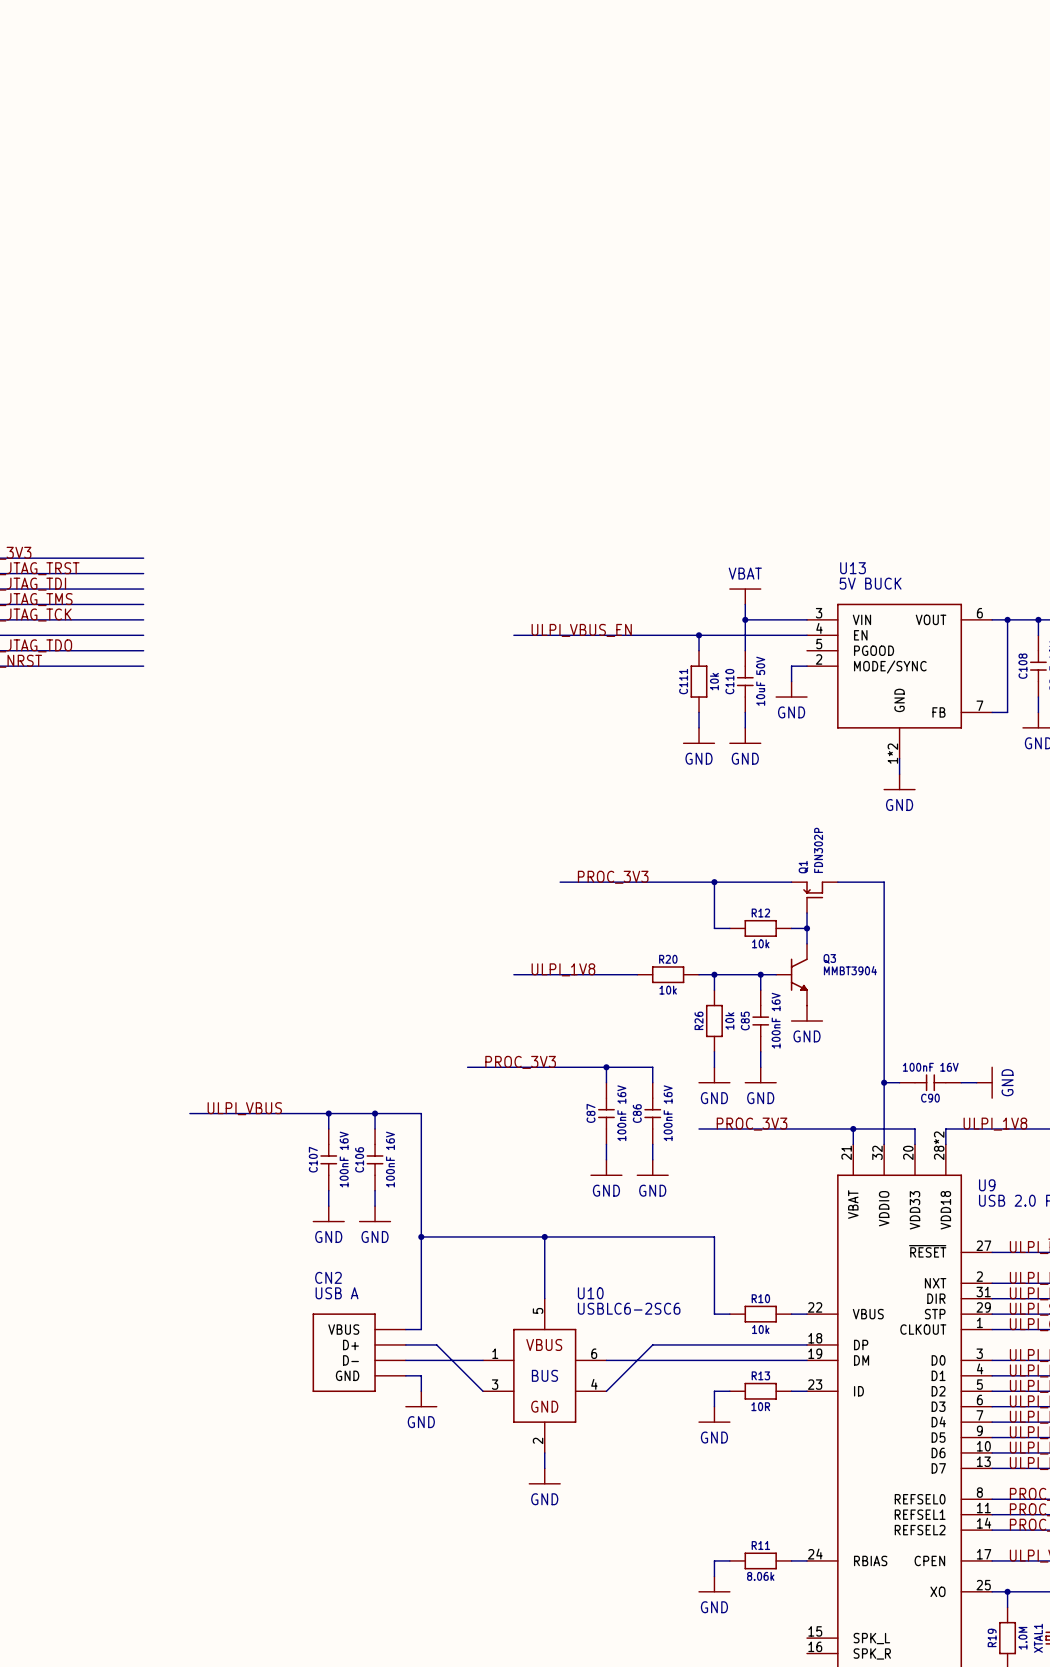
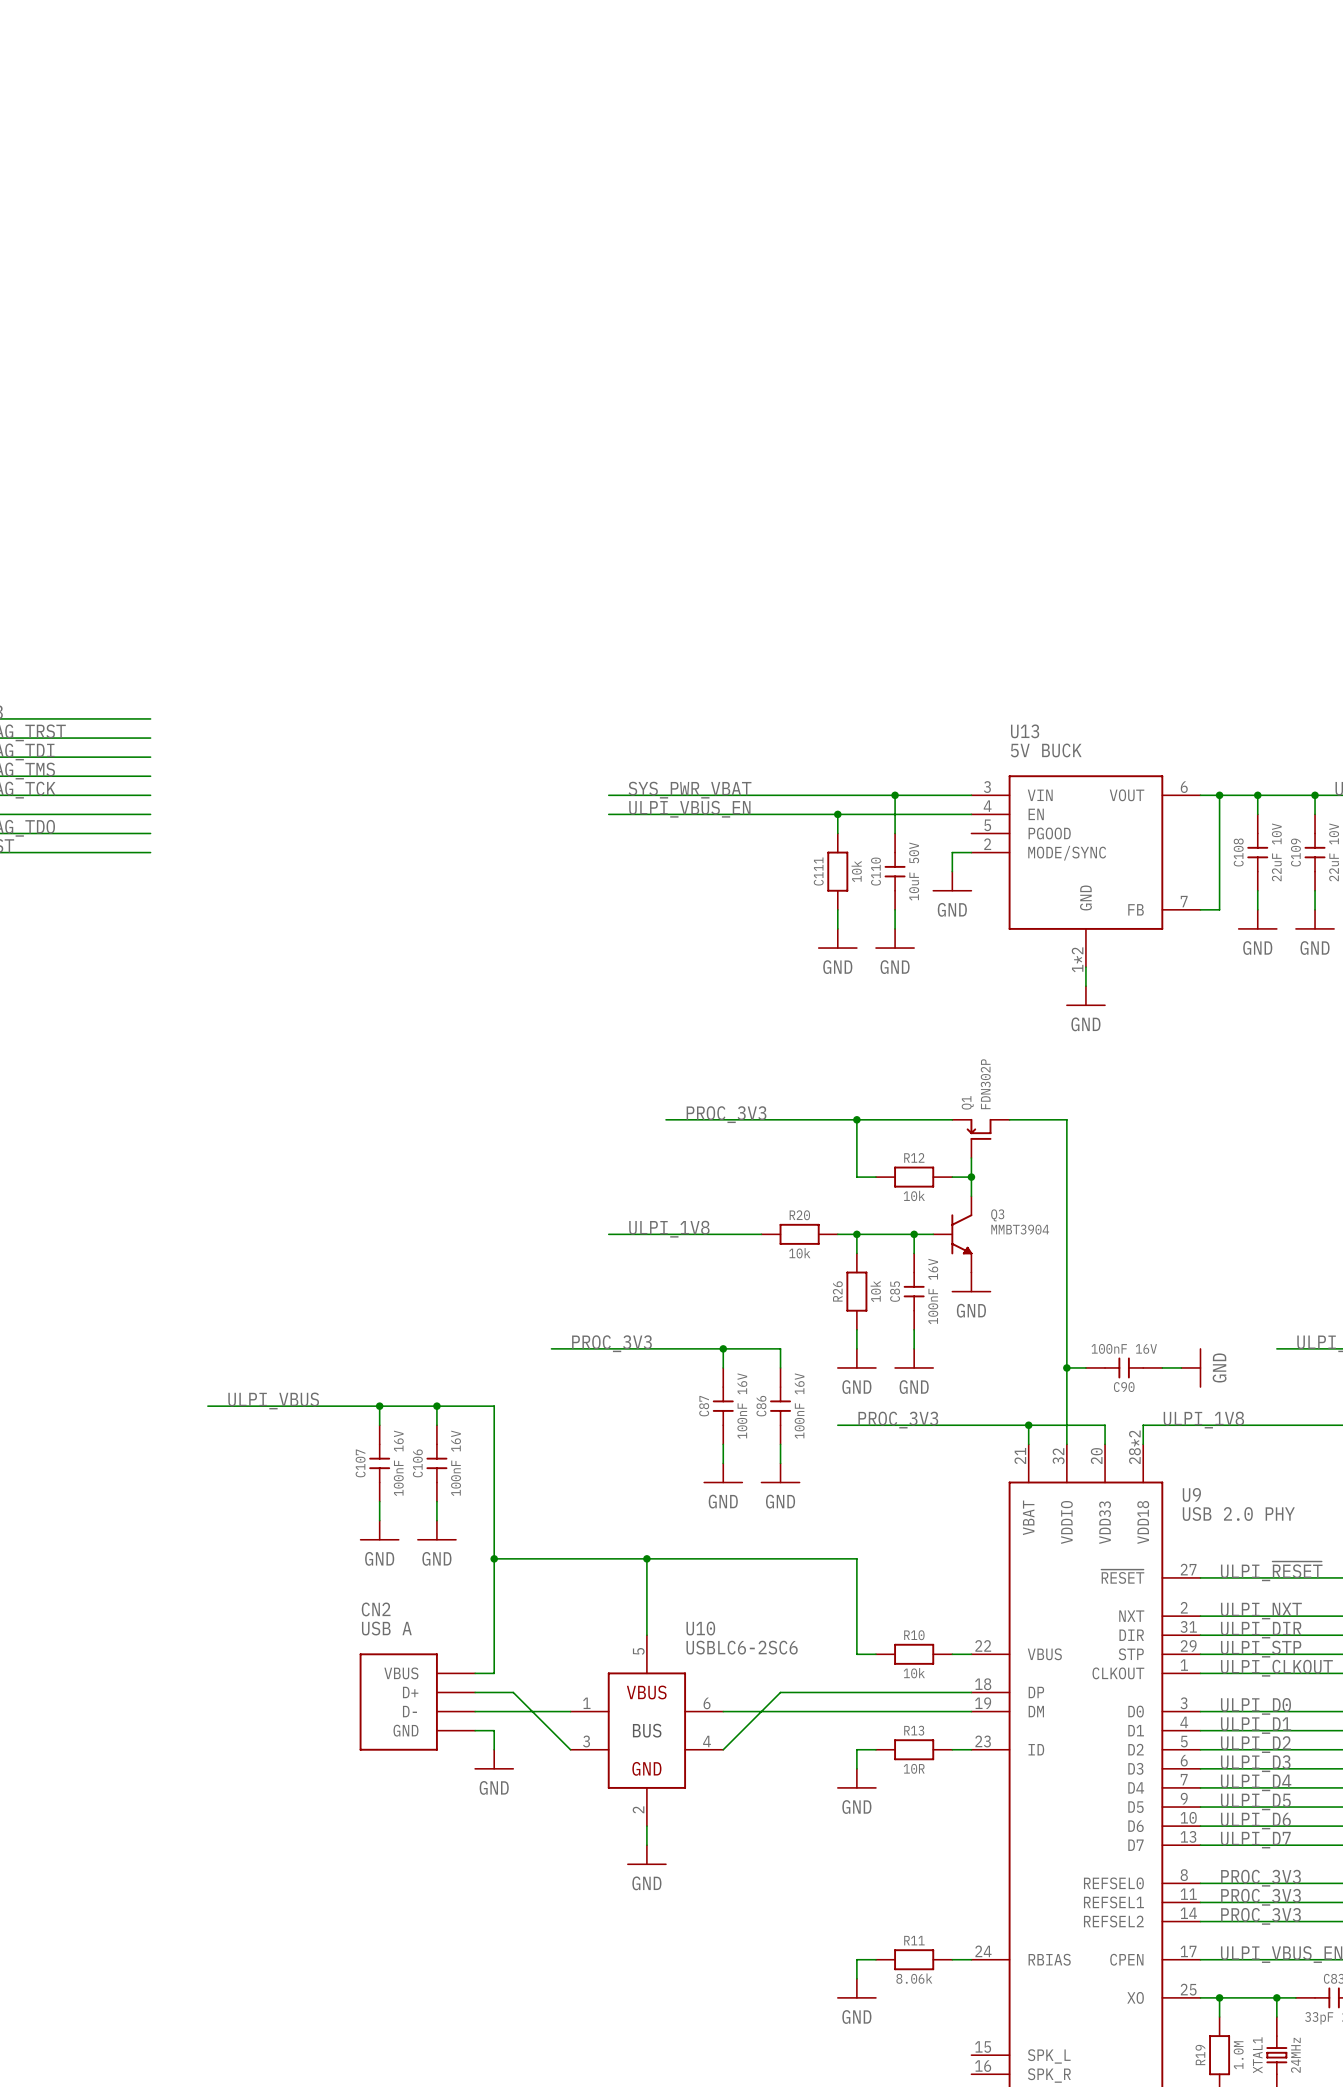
power symbol: VBAT (745, 596) -> none
wire: (745, 604) (745, 619) -> (608, 795) (895, 795)
label: none -> SYS_PWR_VBAT (690, 790)

